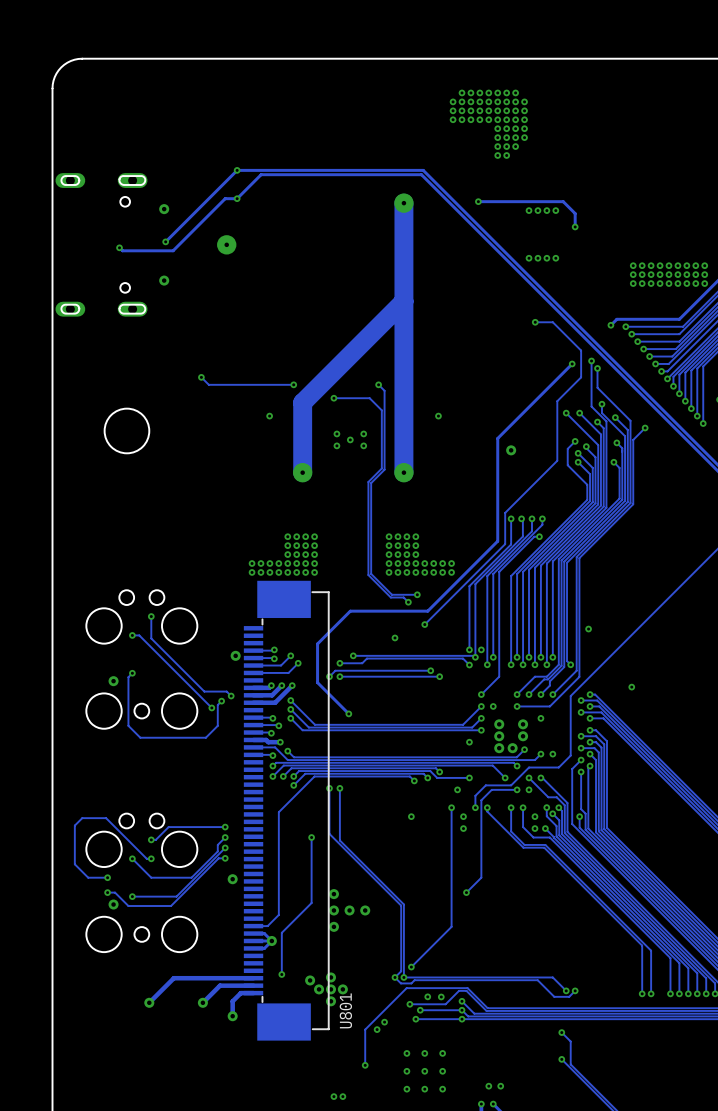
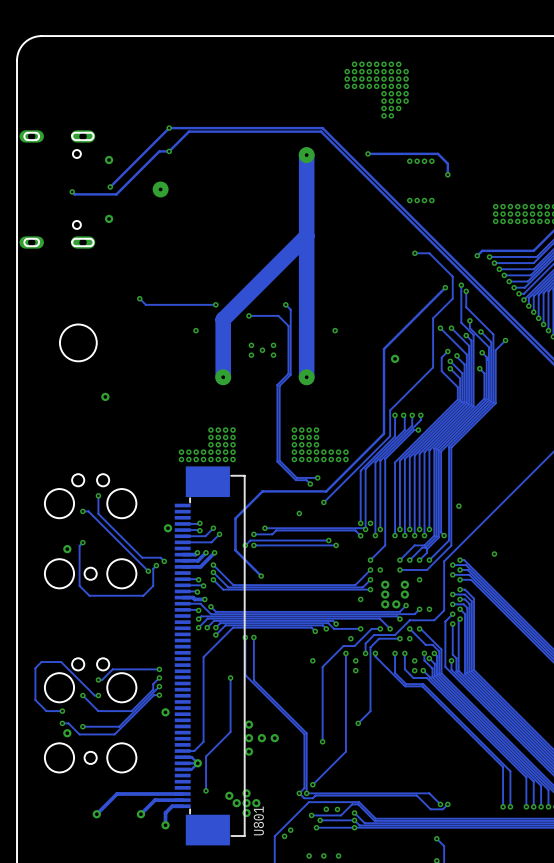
via: none -> (105, 396)
track: none -> (380, 628) (371, 628) (354, 646) (343, 646) (322, 666) (322, 741)
via: none -> (380, 628)
via: none -> (322, 741)

